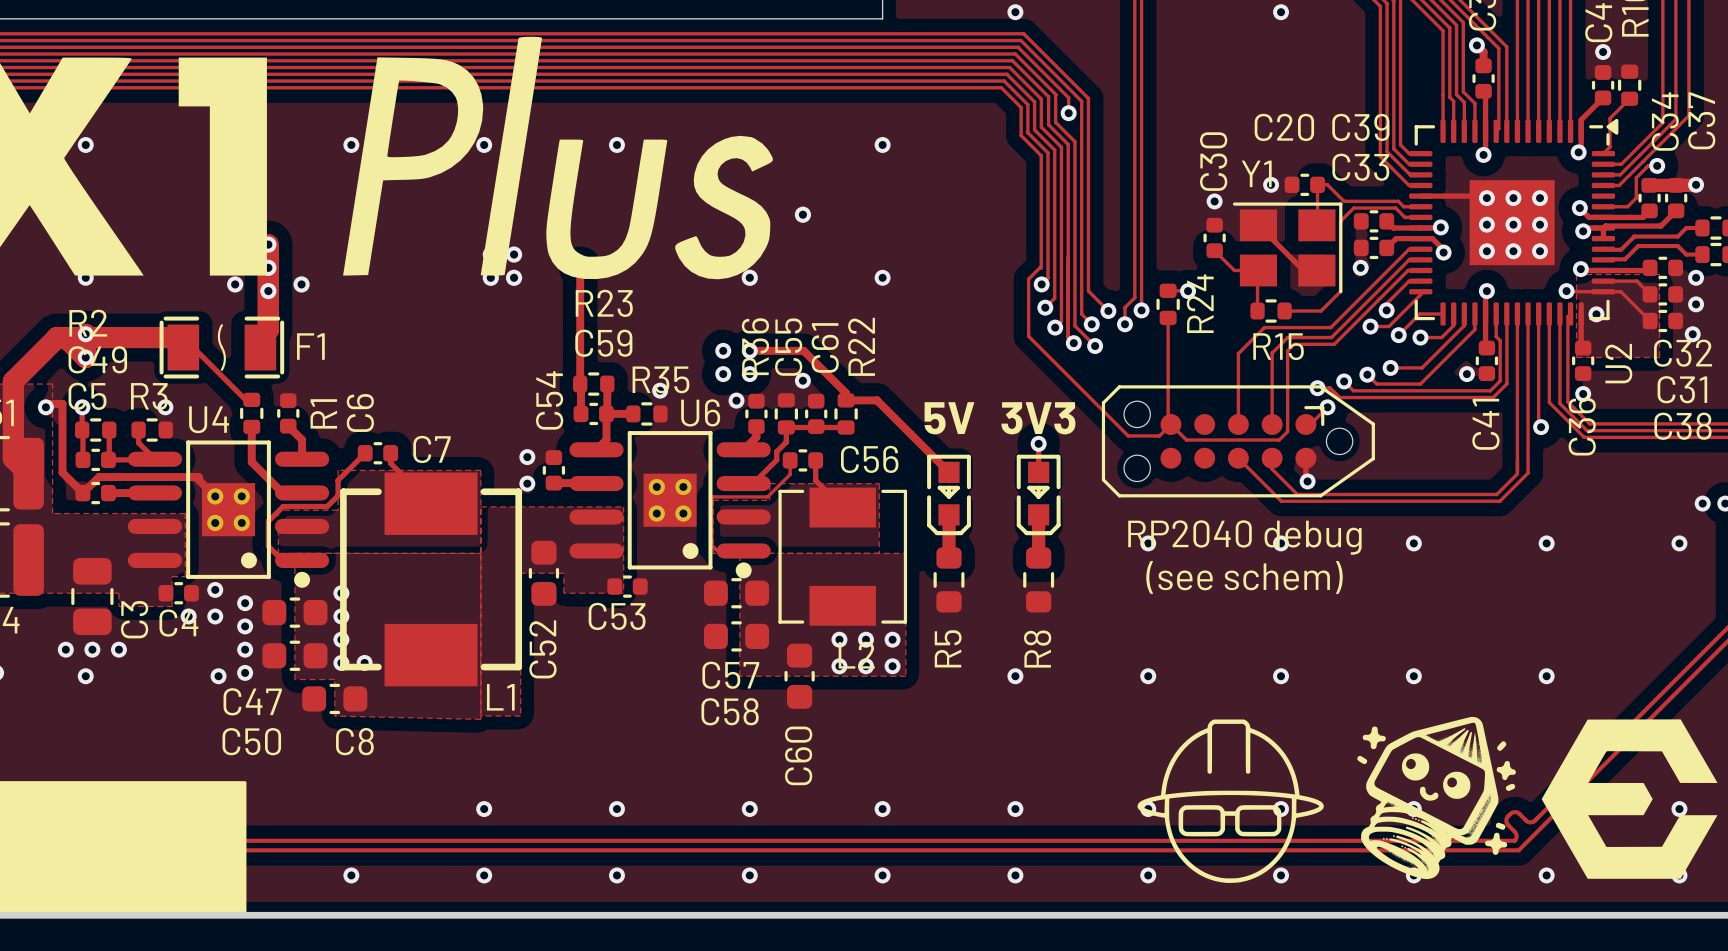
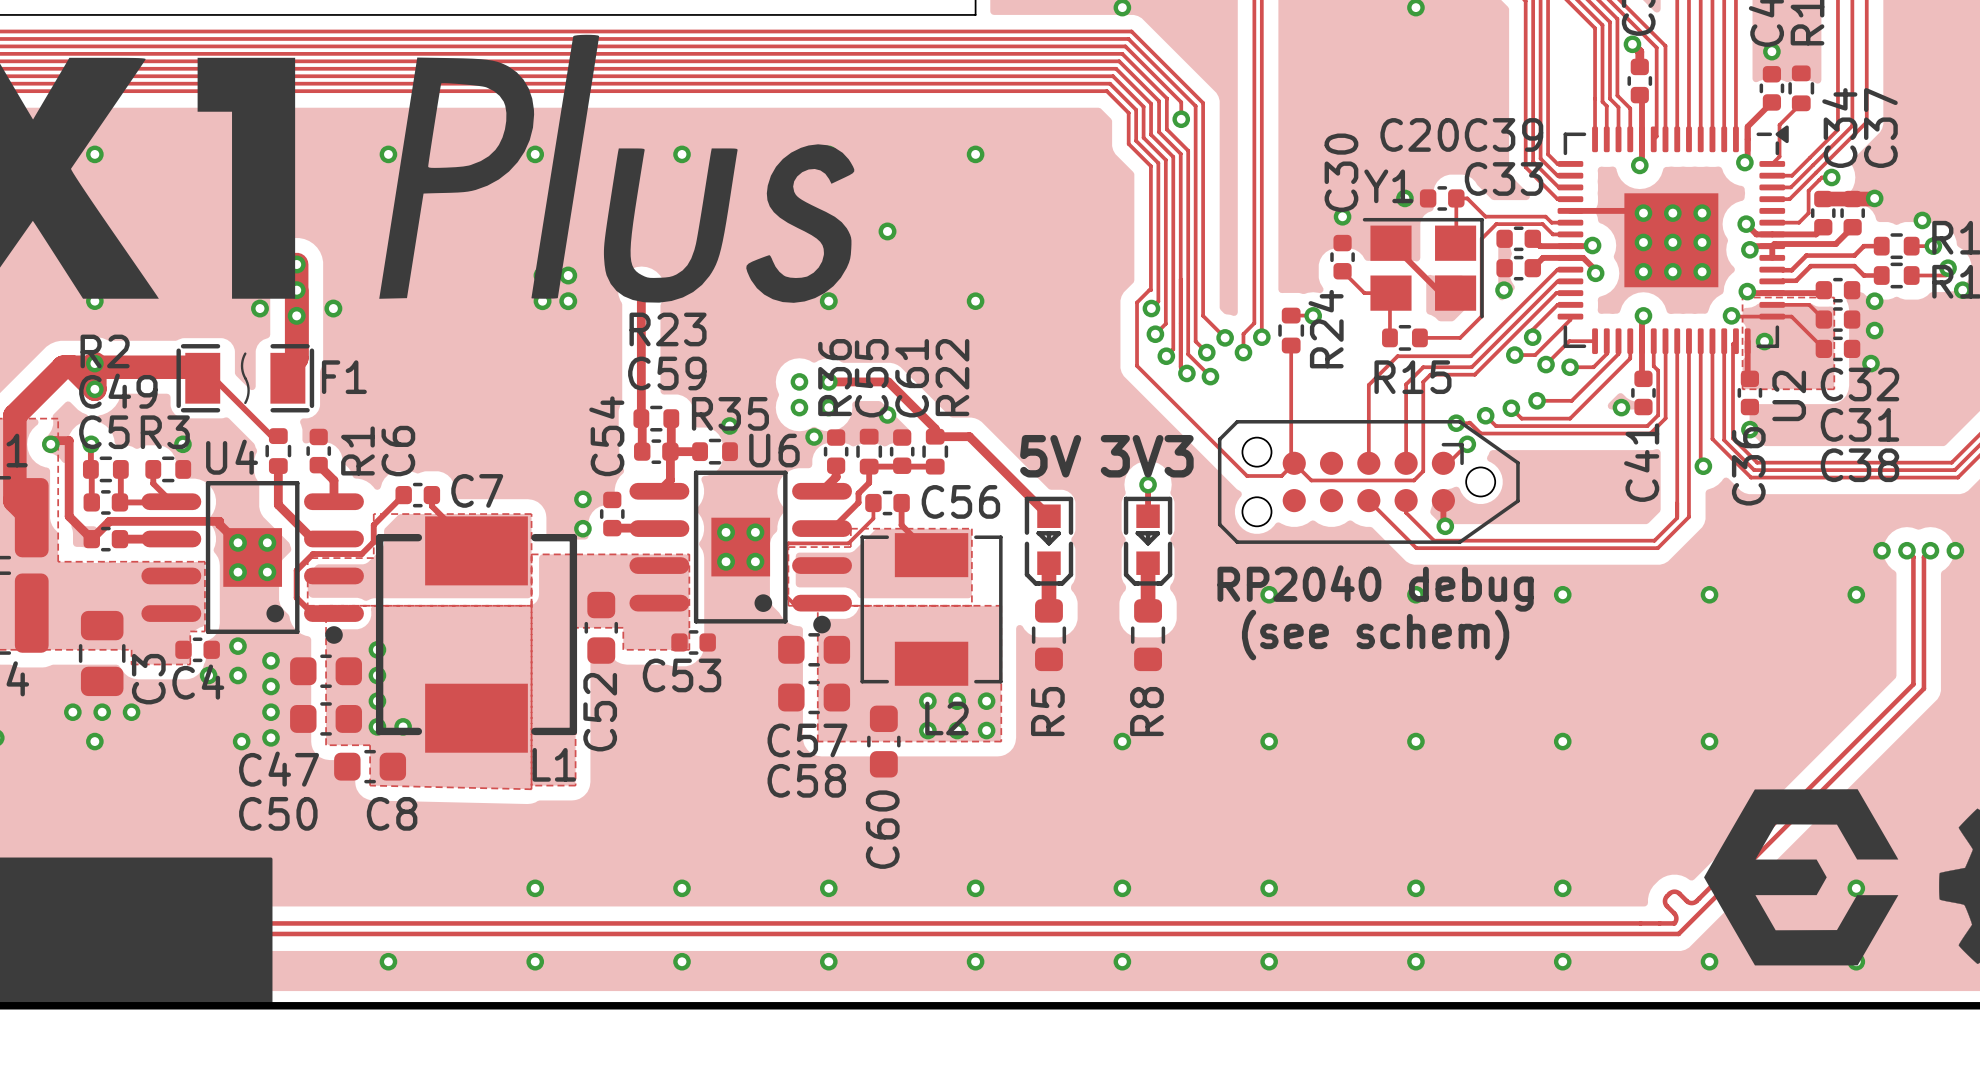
drawing: [1357, 716, 1516, 880] -> none
drawing: [1137, 719, 1324, 883] -> none

